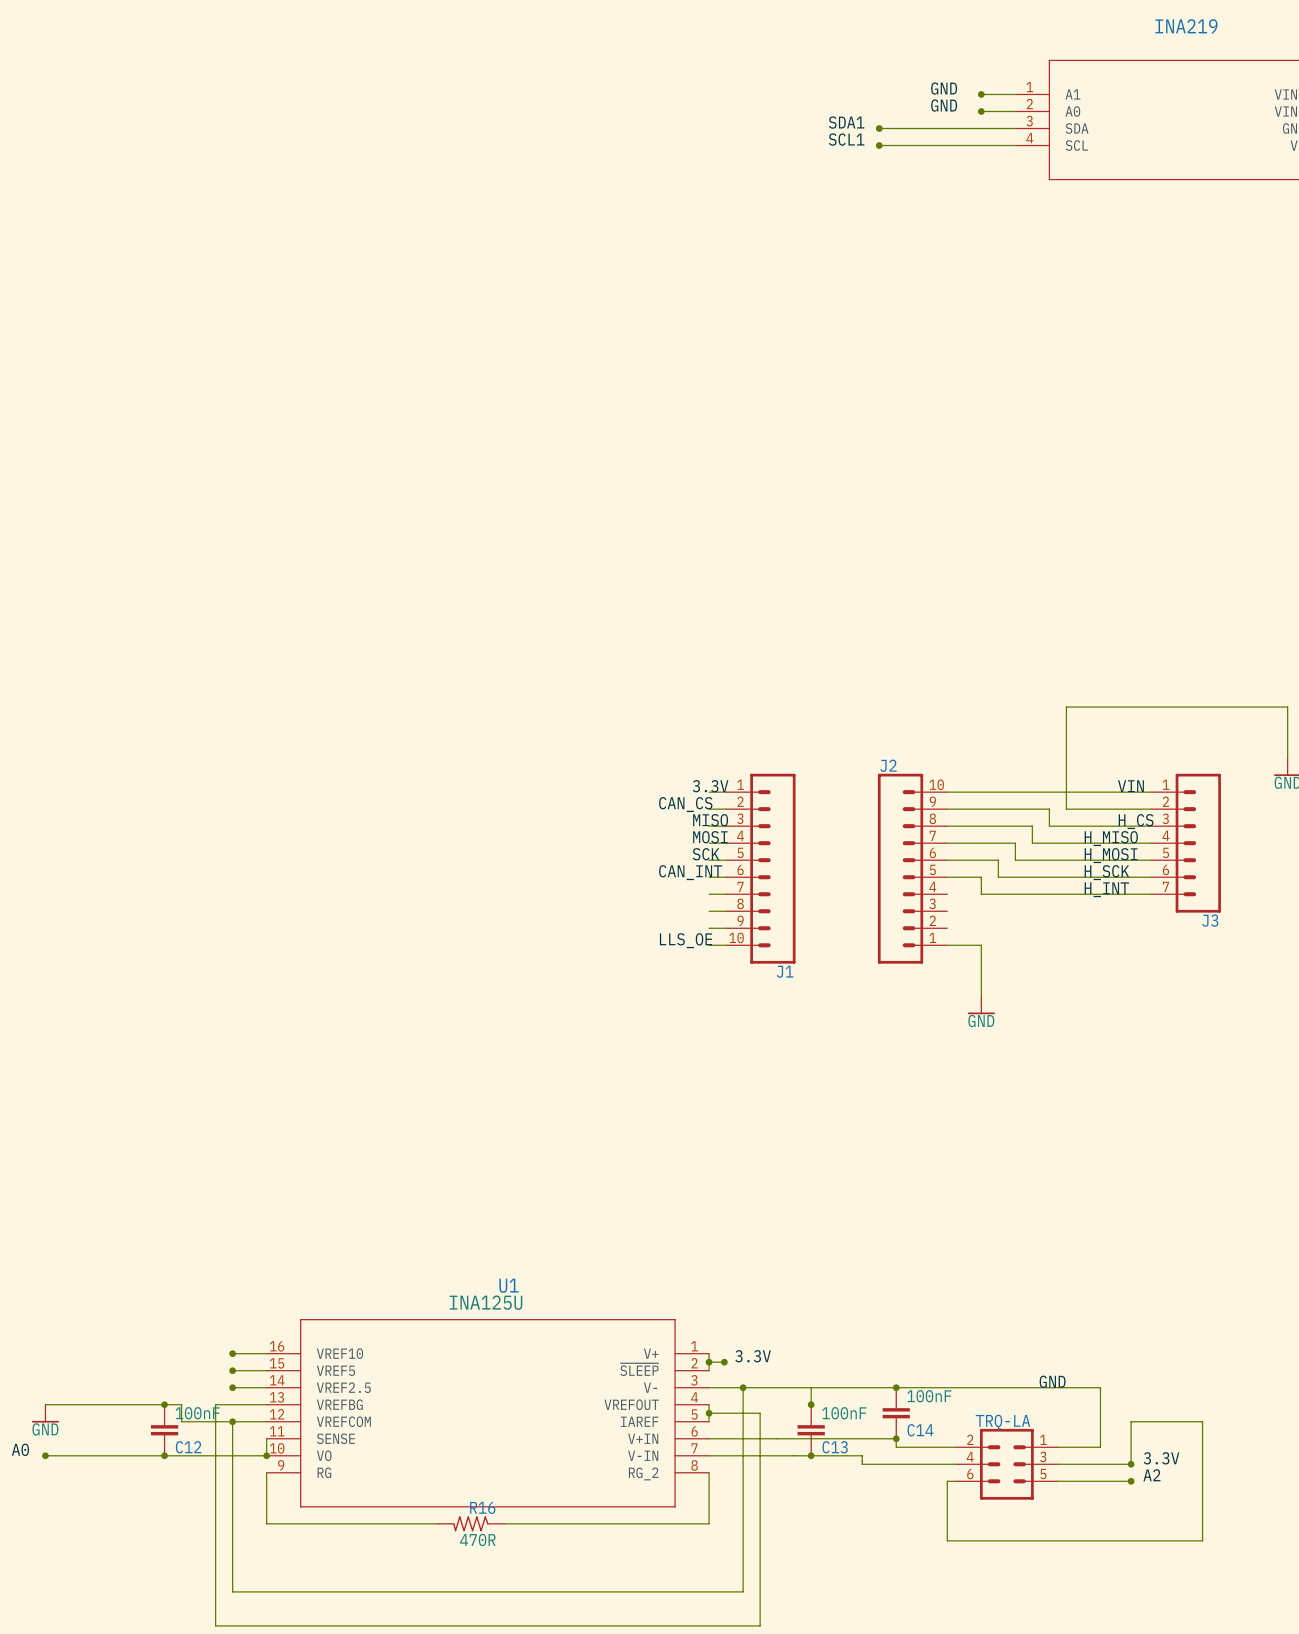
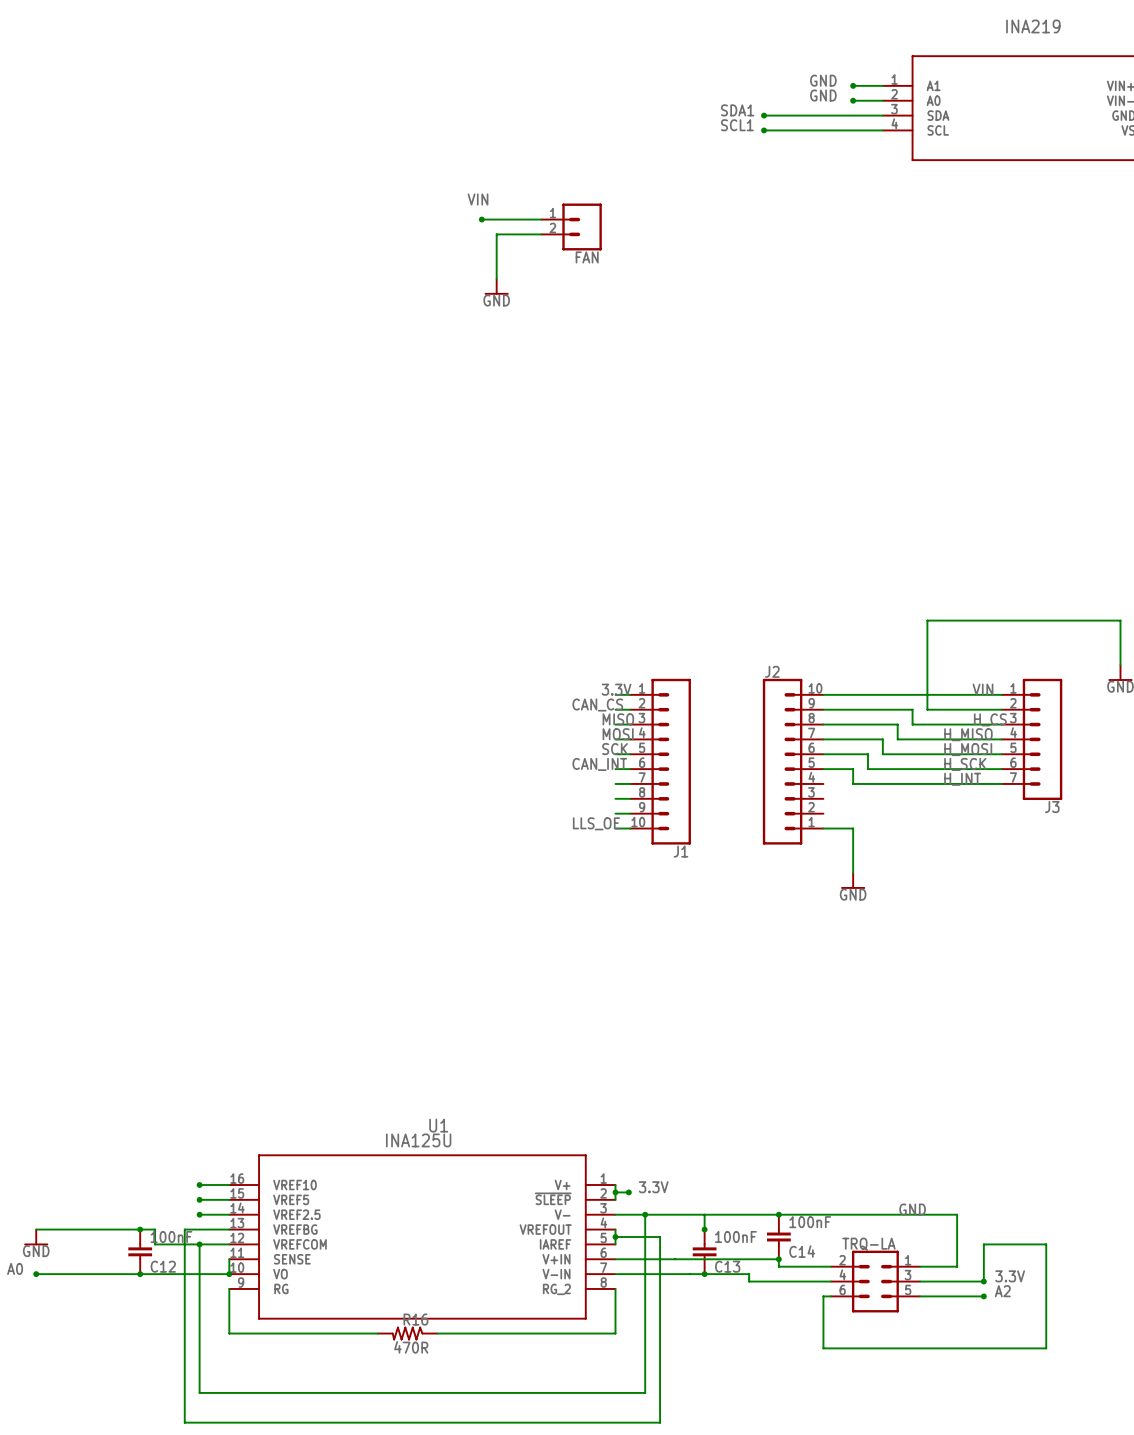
label: none -> VIN (477, 199)
wire: none -> (481, 219) (541, 219)
junction: none -> (481, 219)
FAN: none -> (571, 226)
wire: none -> (541, 234) (496, 234) (496, 278)
power symbol: none -> GND (496, 286)

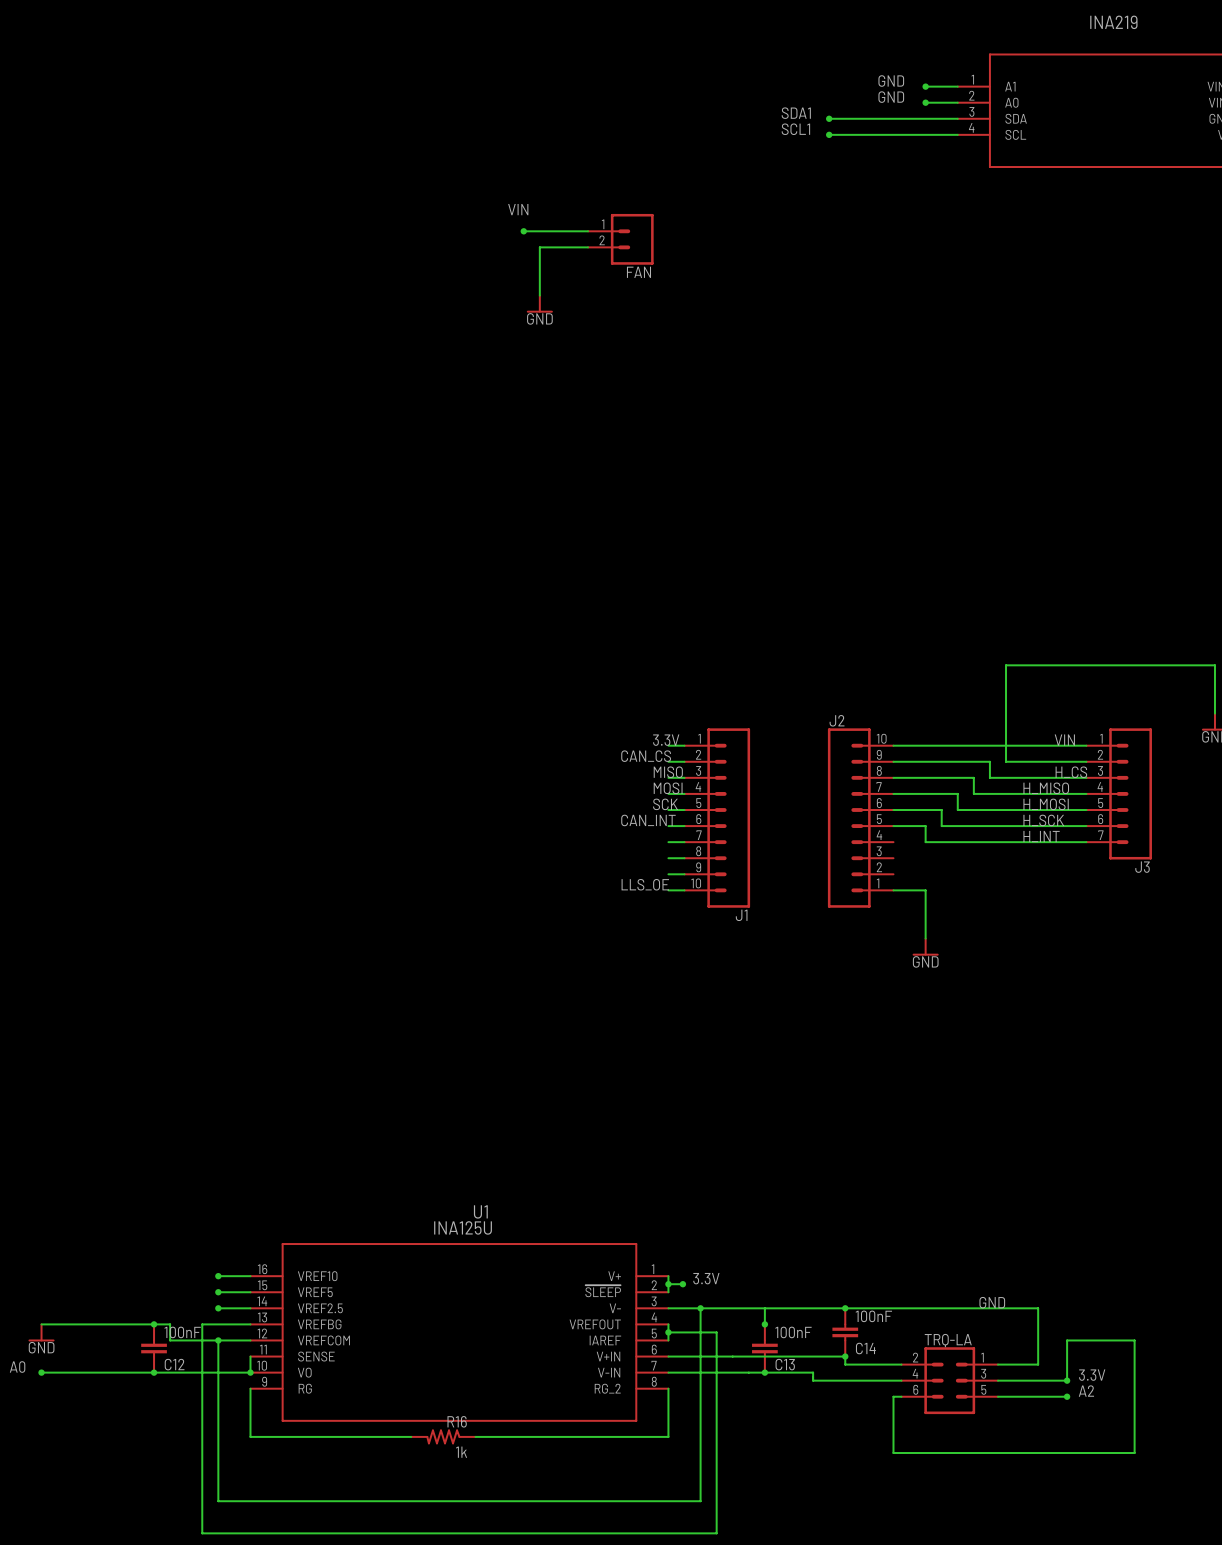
R16 value: 470R (411, 1347) -> 1k (461, 1452)

